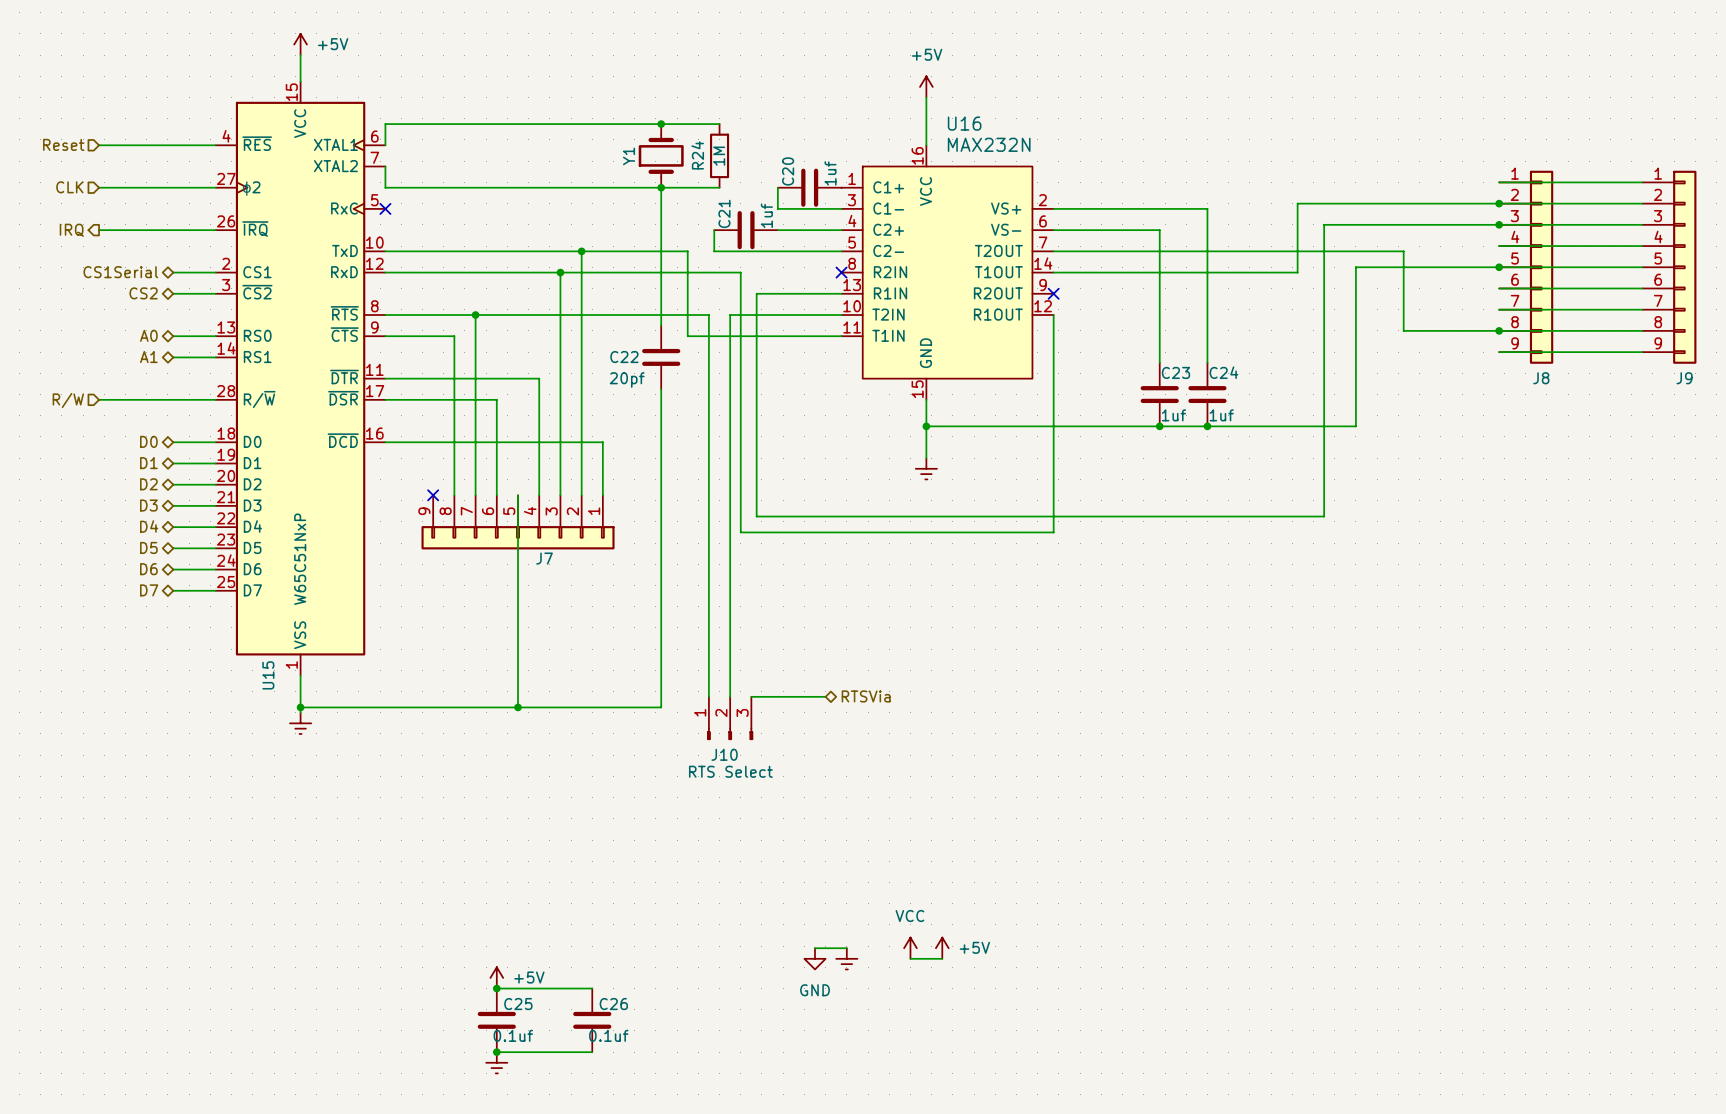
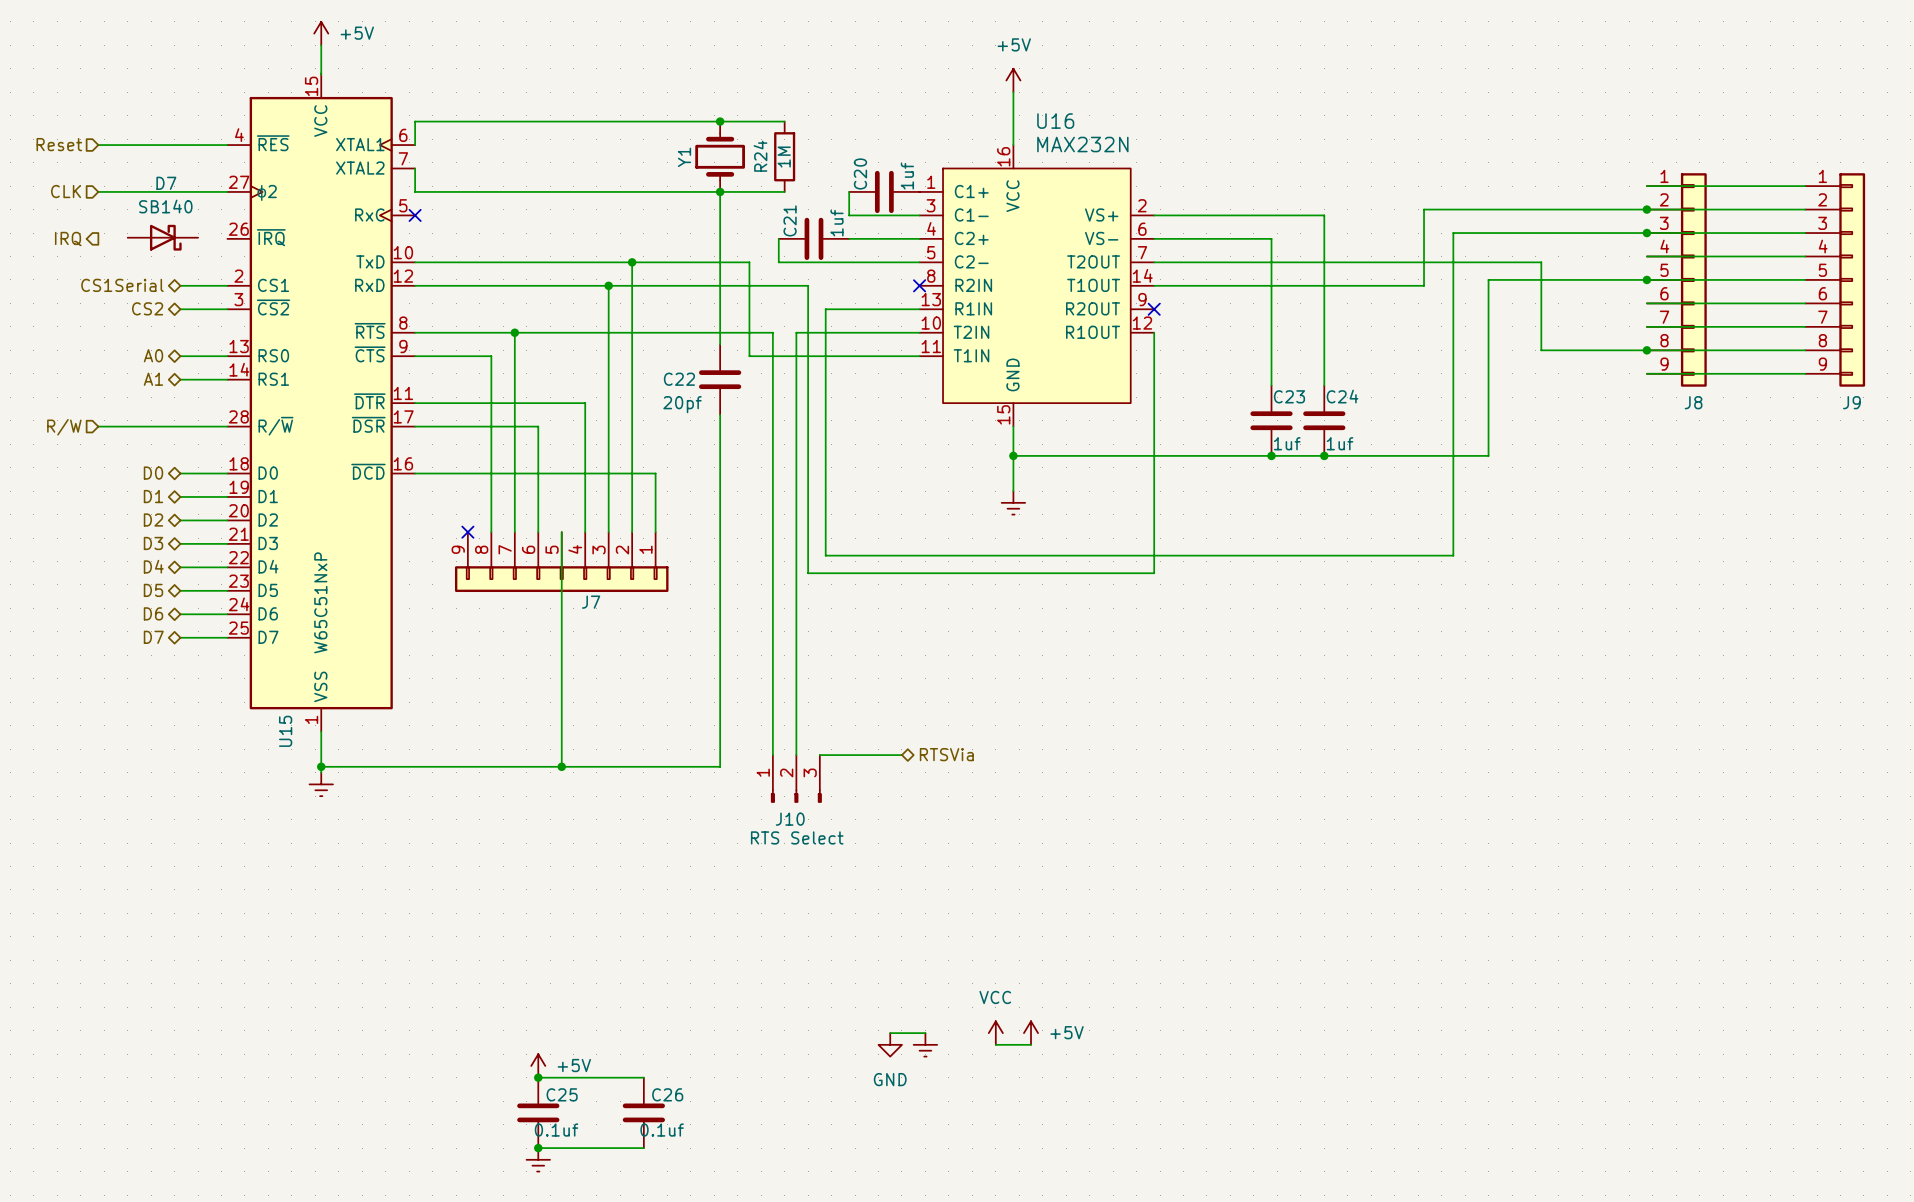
D7: none -> SB140 (162, 237)
wire: (99, 230) (215, 230) -> none

